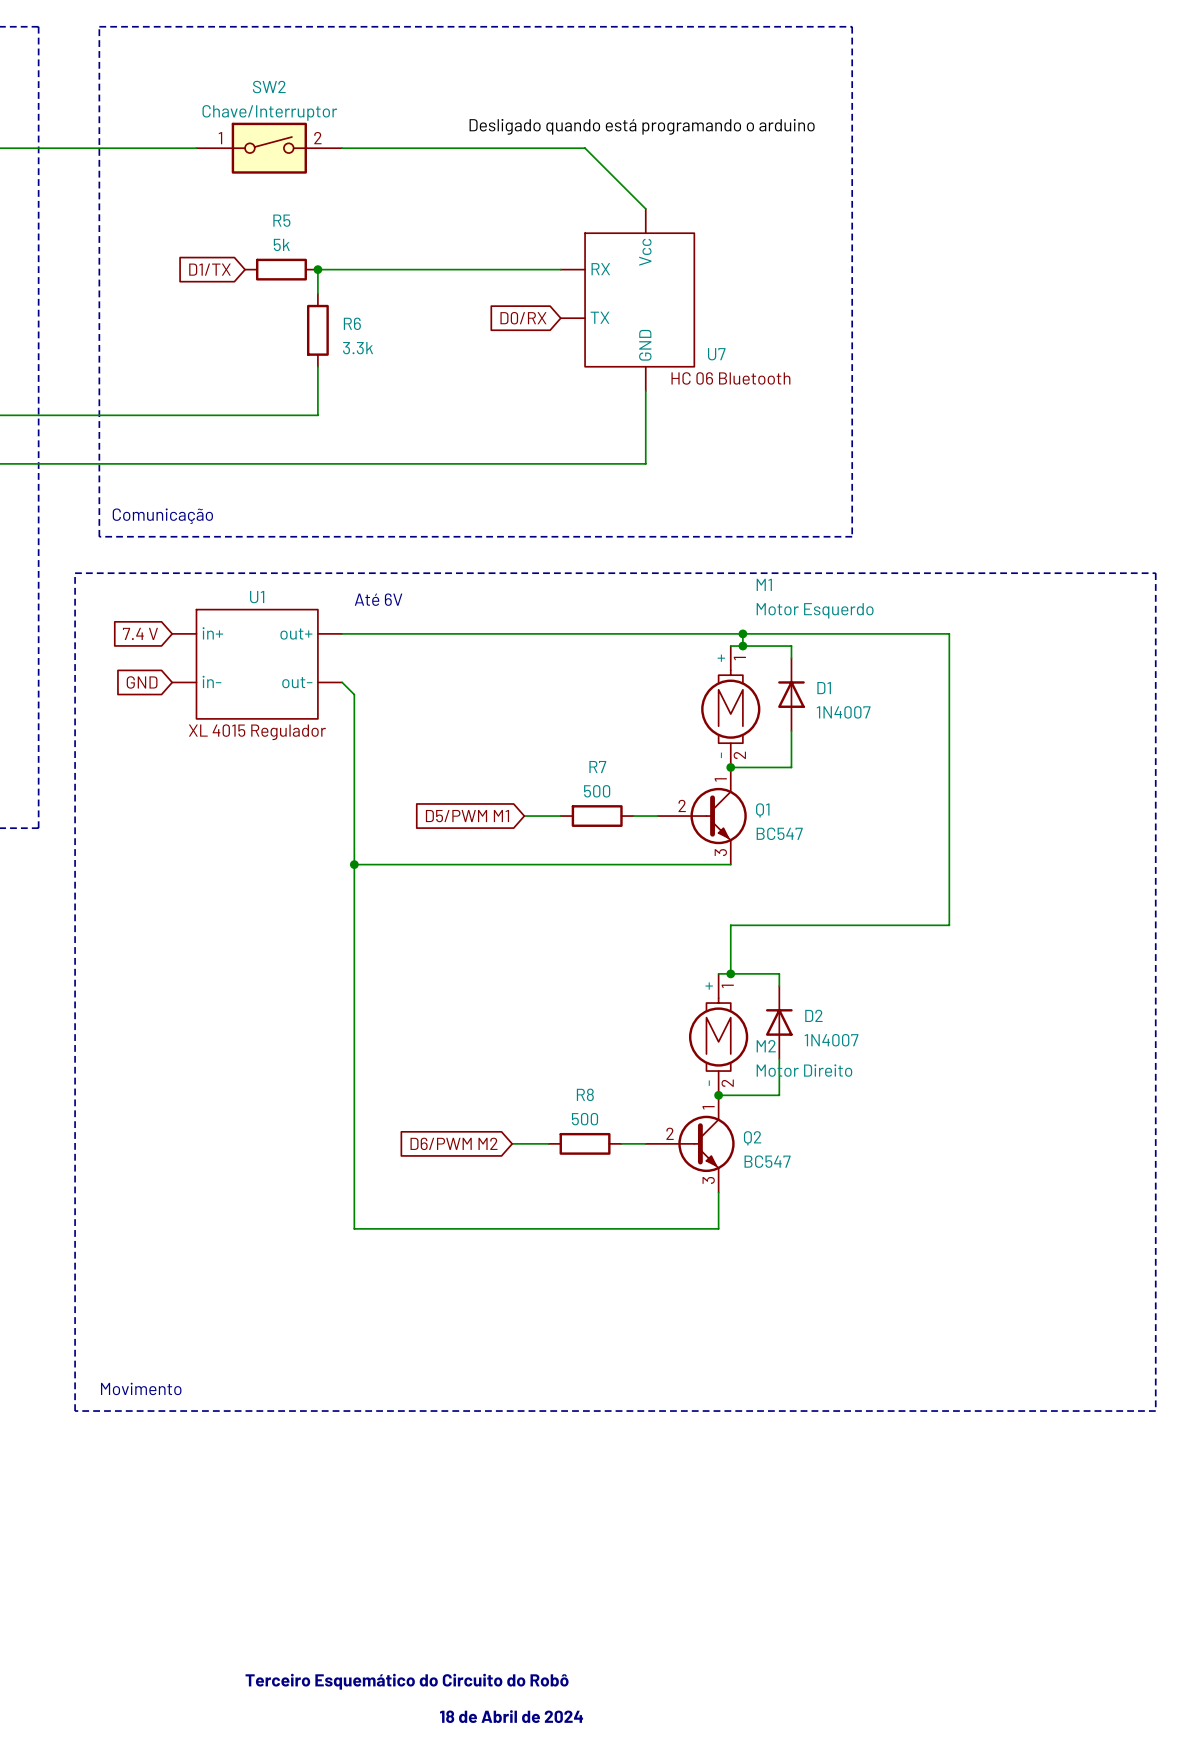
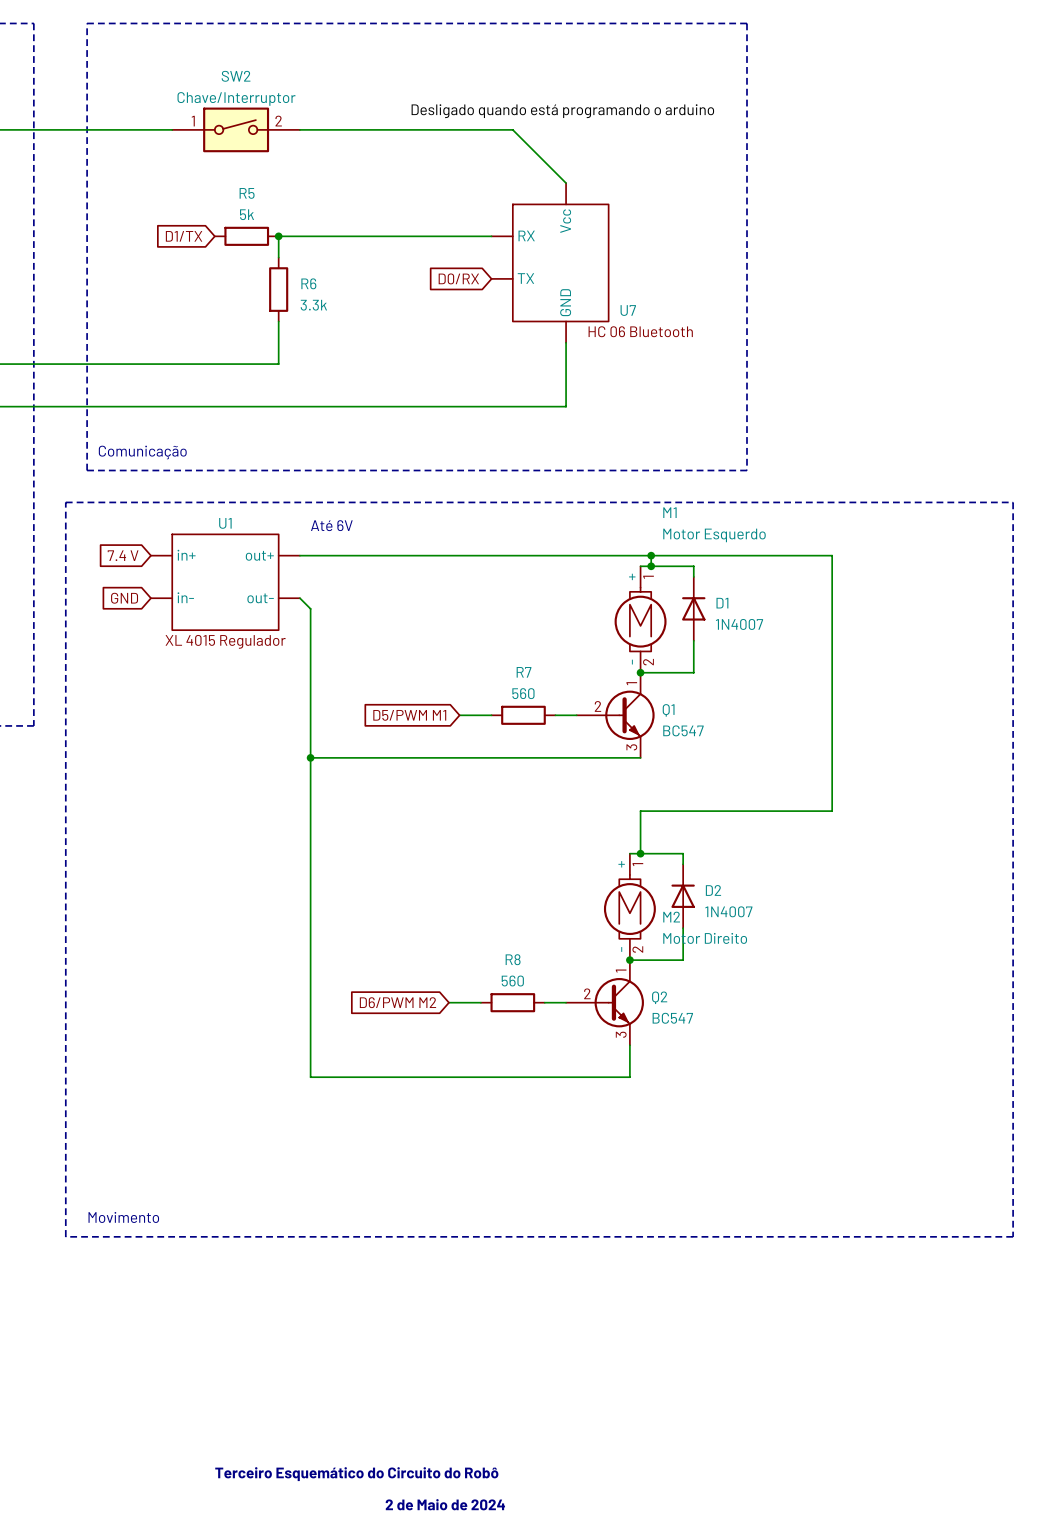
R7 value: 500 (597, 791) -> 560 (523, 693)
R8 value: 500 (585, 1119) -> 560 (512, 981)
text: 18 de Abril de 2024 (511, 1716) -> 2 de Maio de 2024 (445, 1504)

